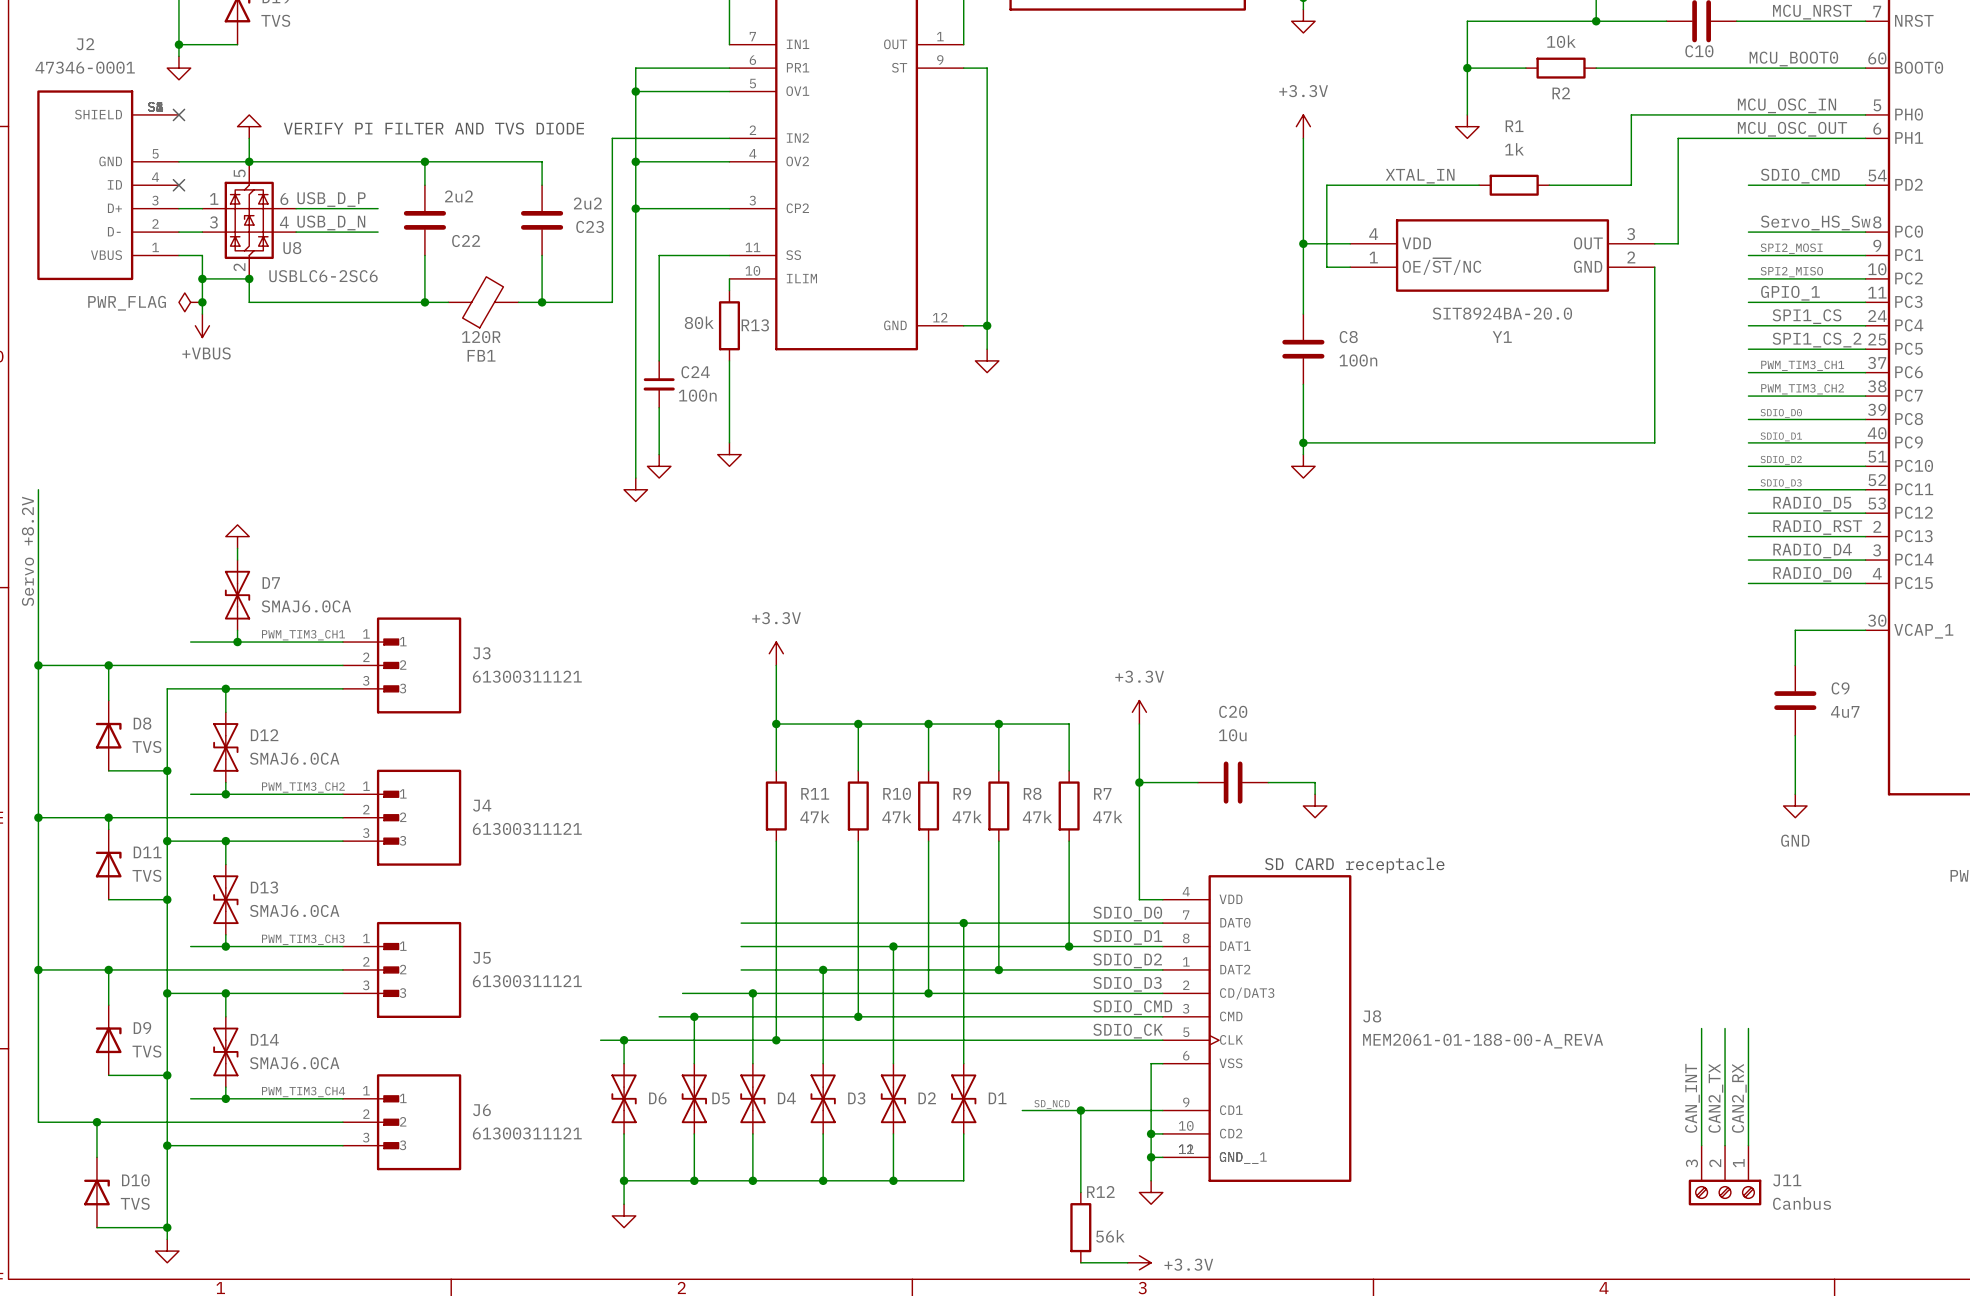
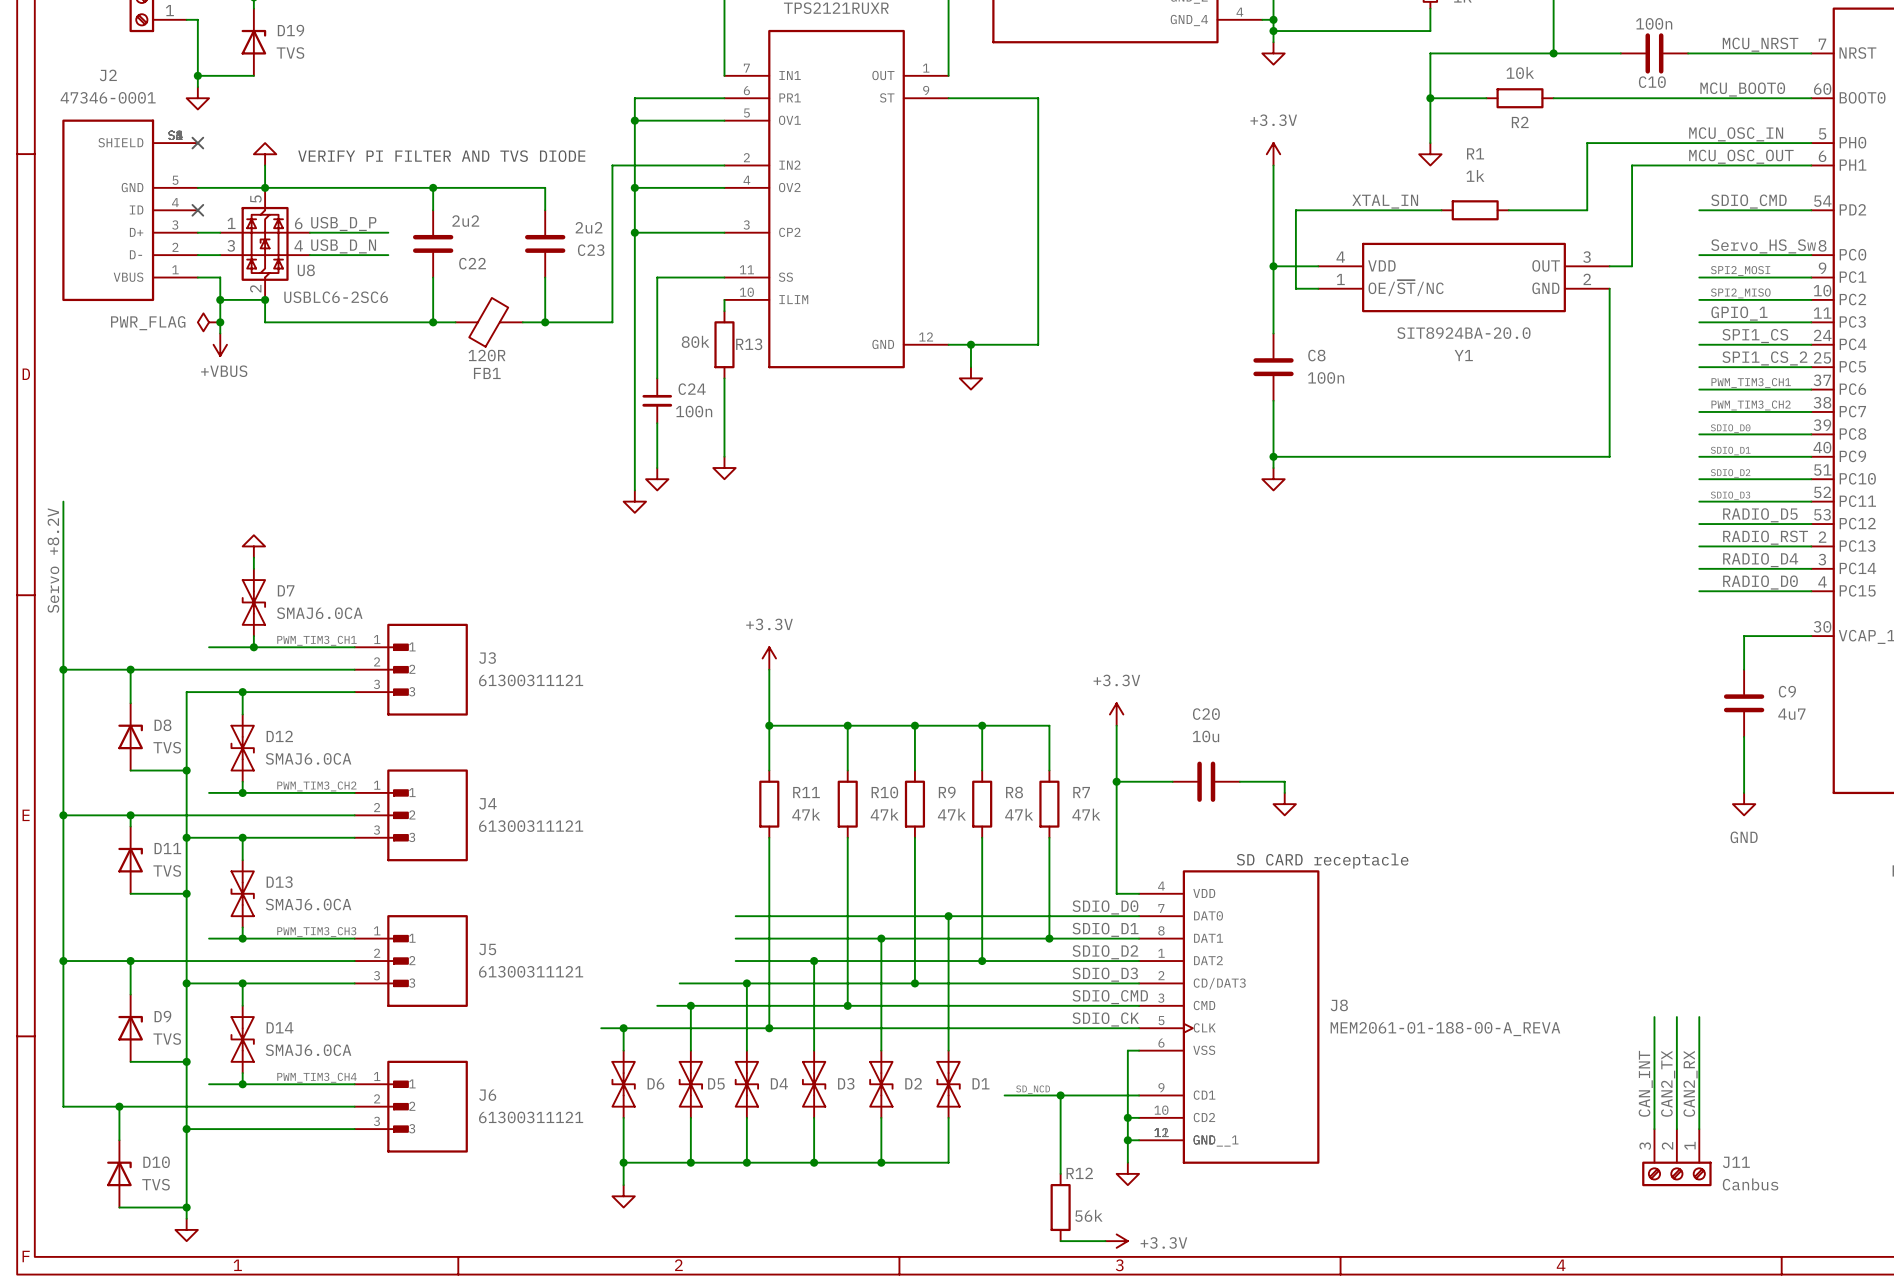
wire: (987, 68) (987, 325) -> (970, 98) (1038, 98) (1038, 344) (970, 344)

